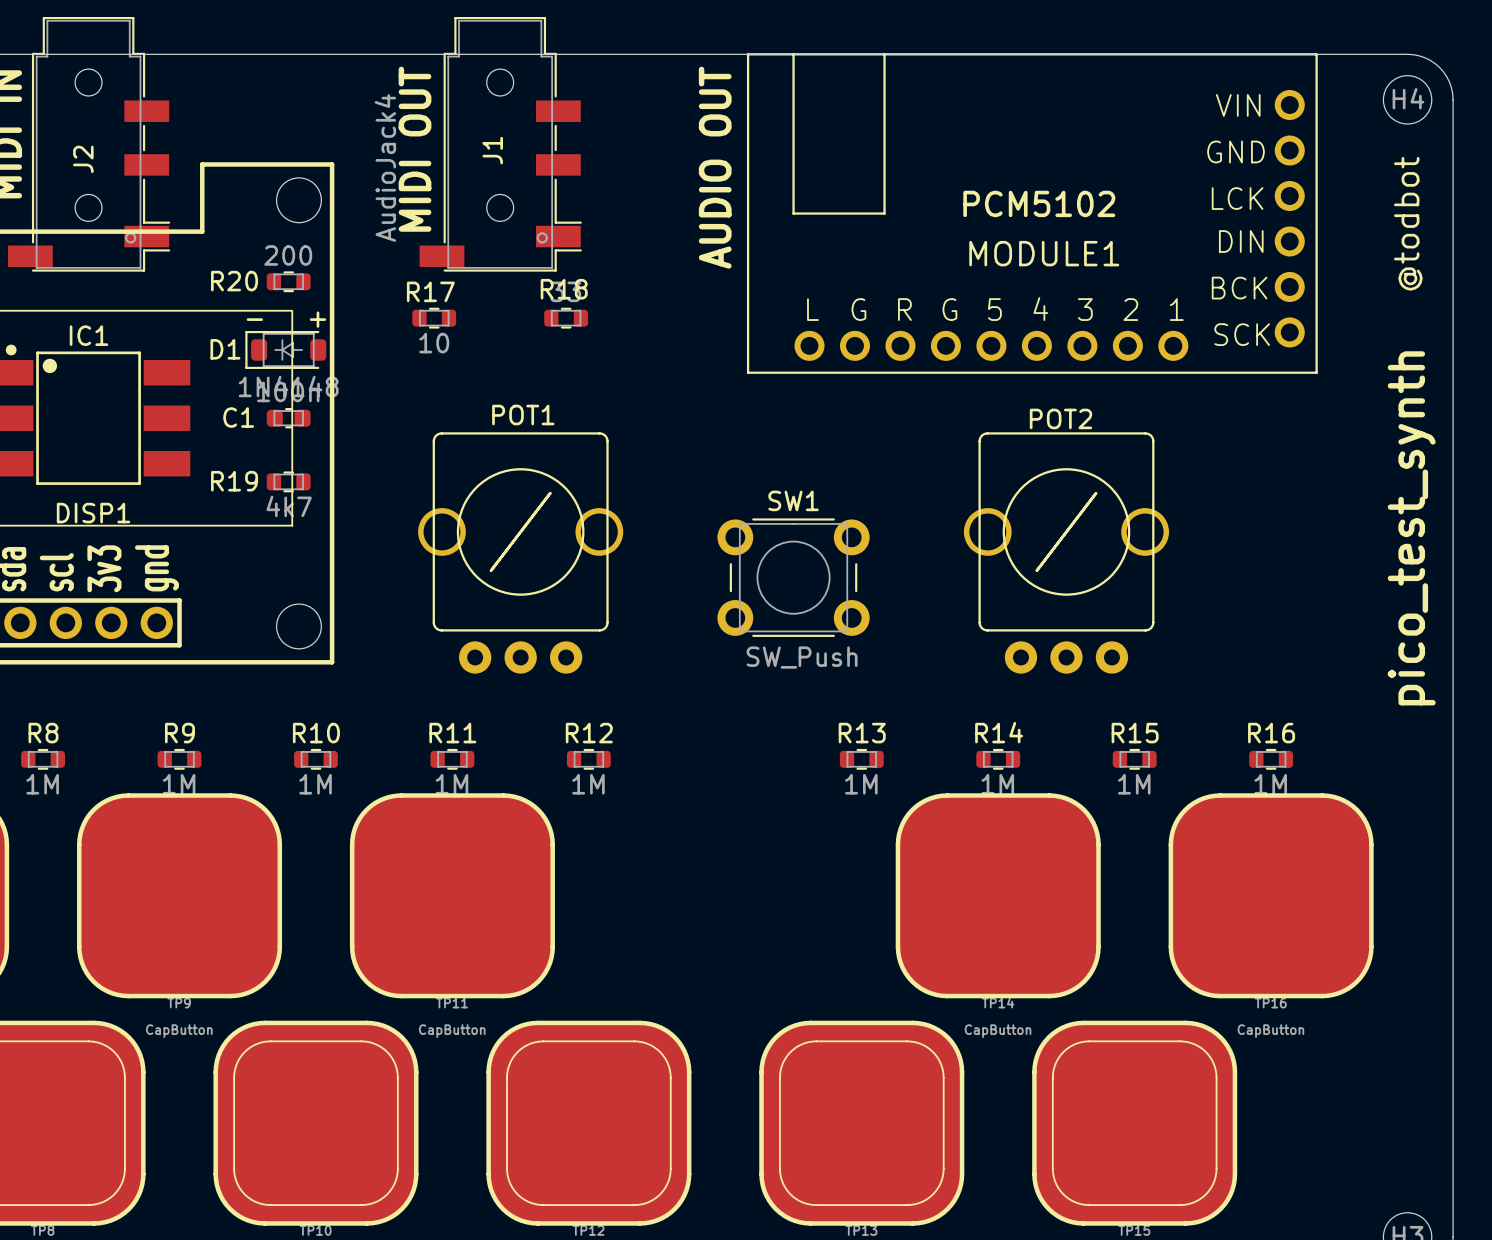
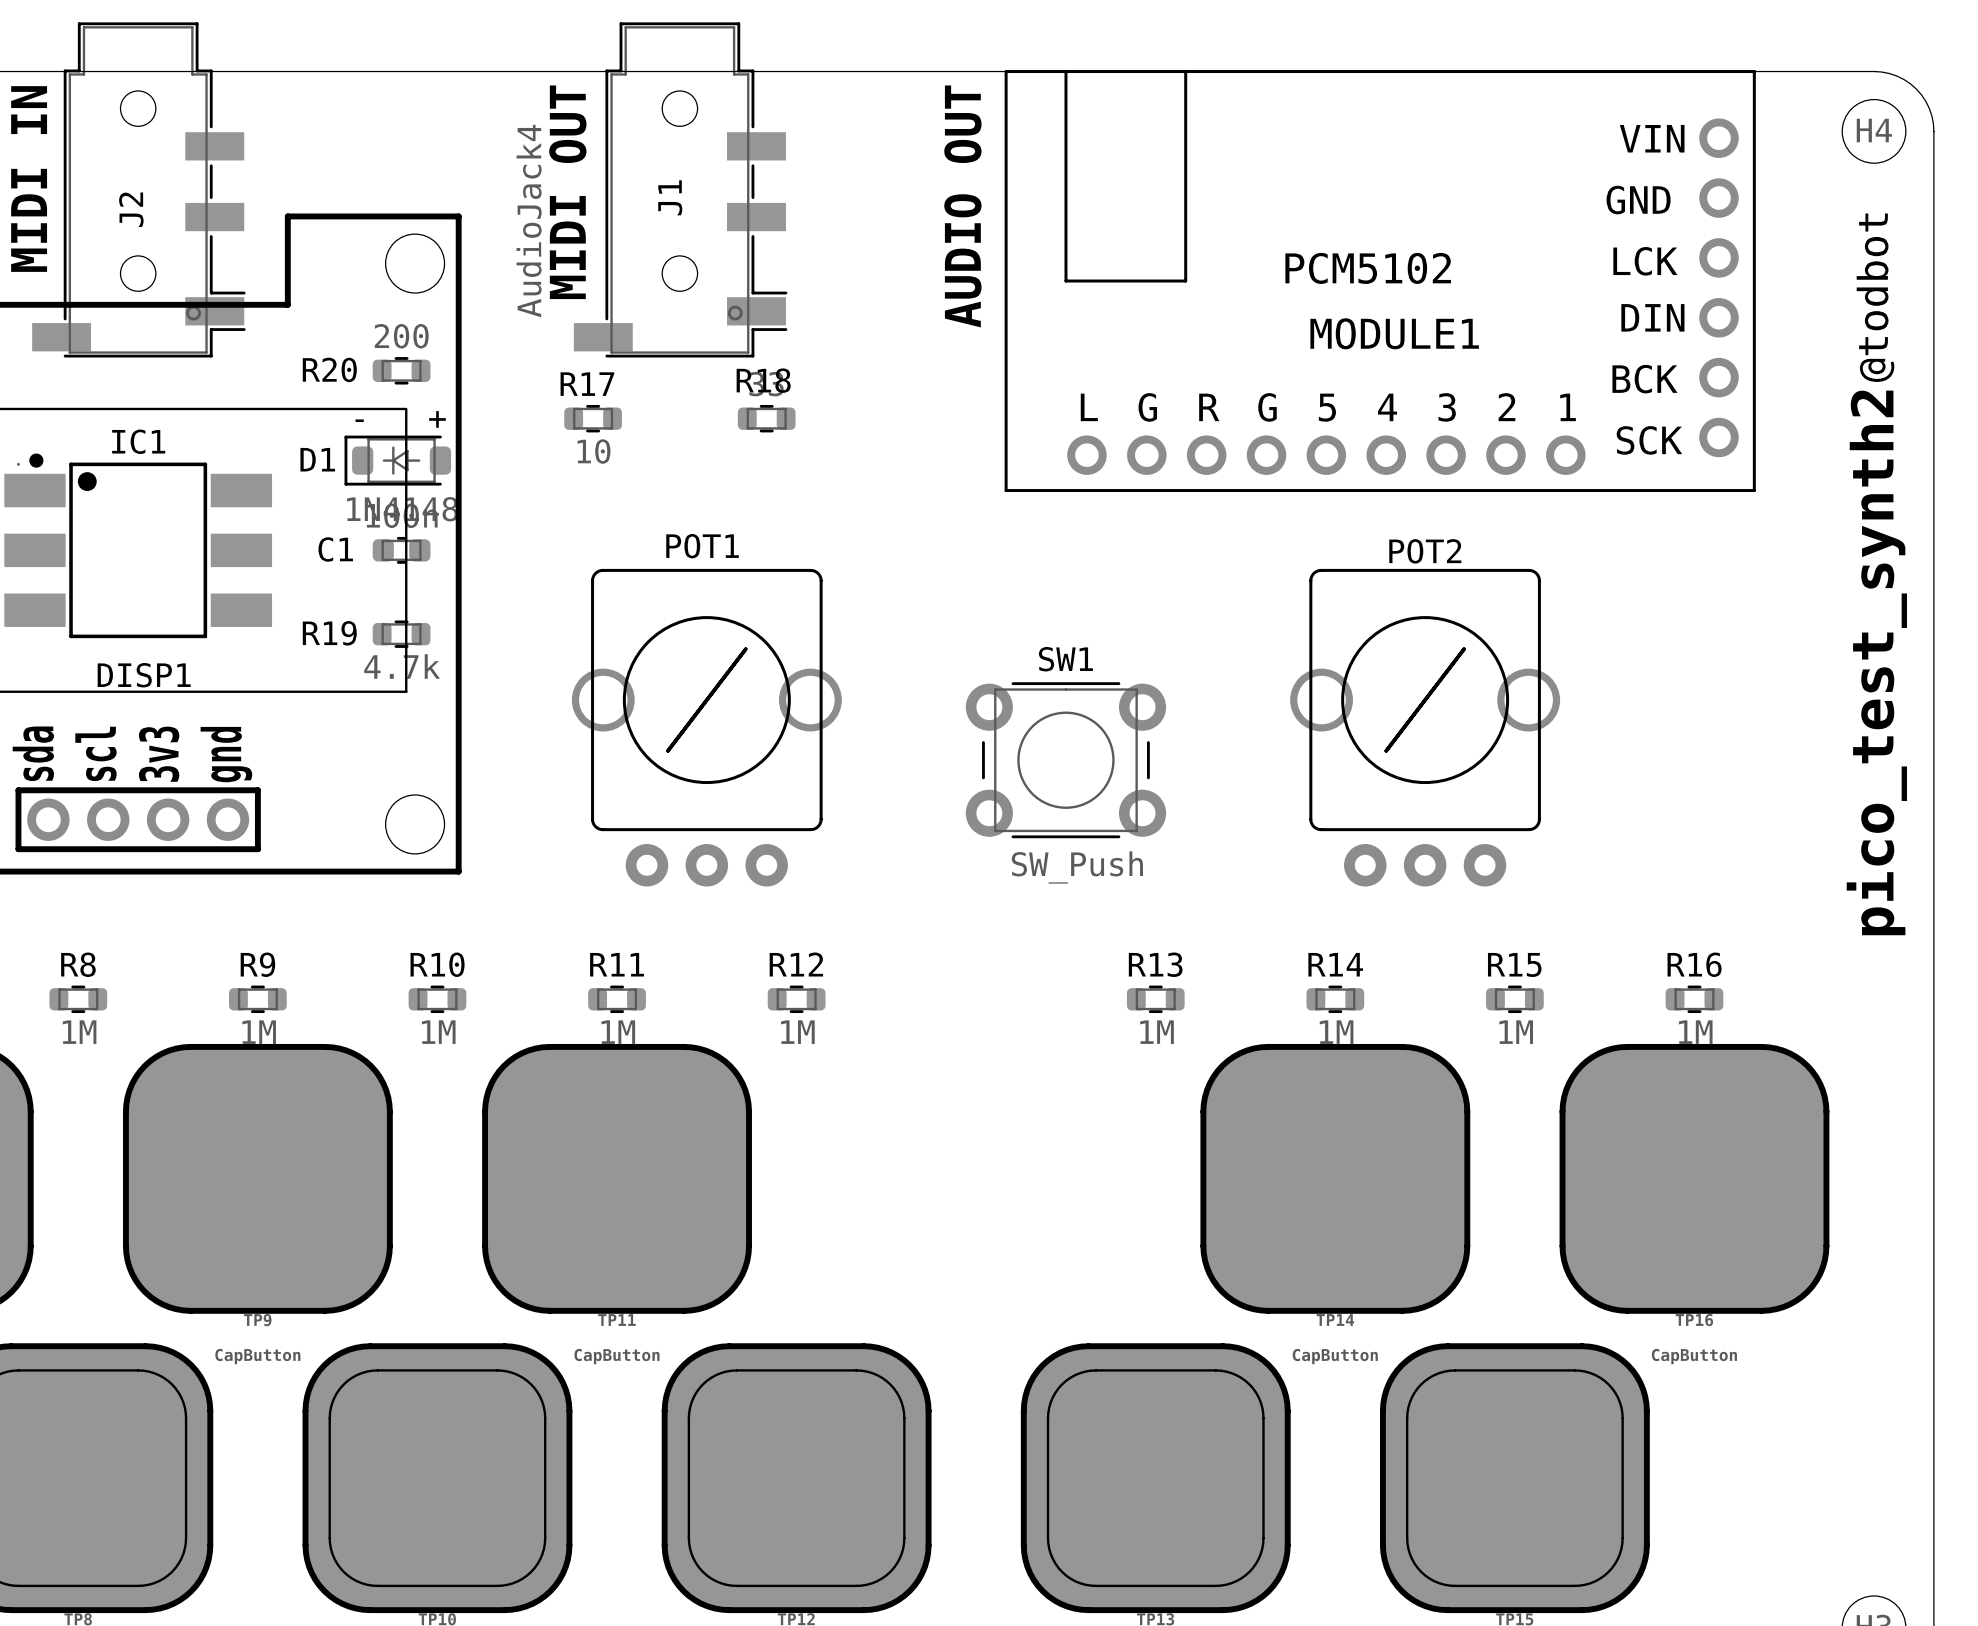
R19 value: 4k7 (289, 506) -> 4.7k (402, 666)
text: pico_test_synth (1411, 528) -> pico_test_synth2 (1876, 662)

